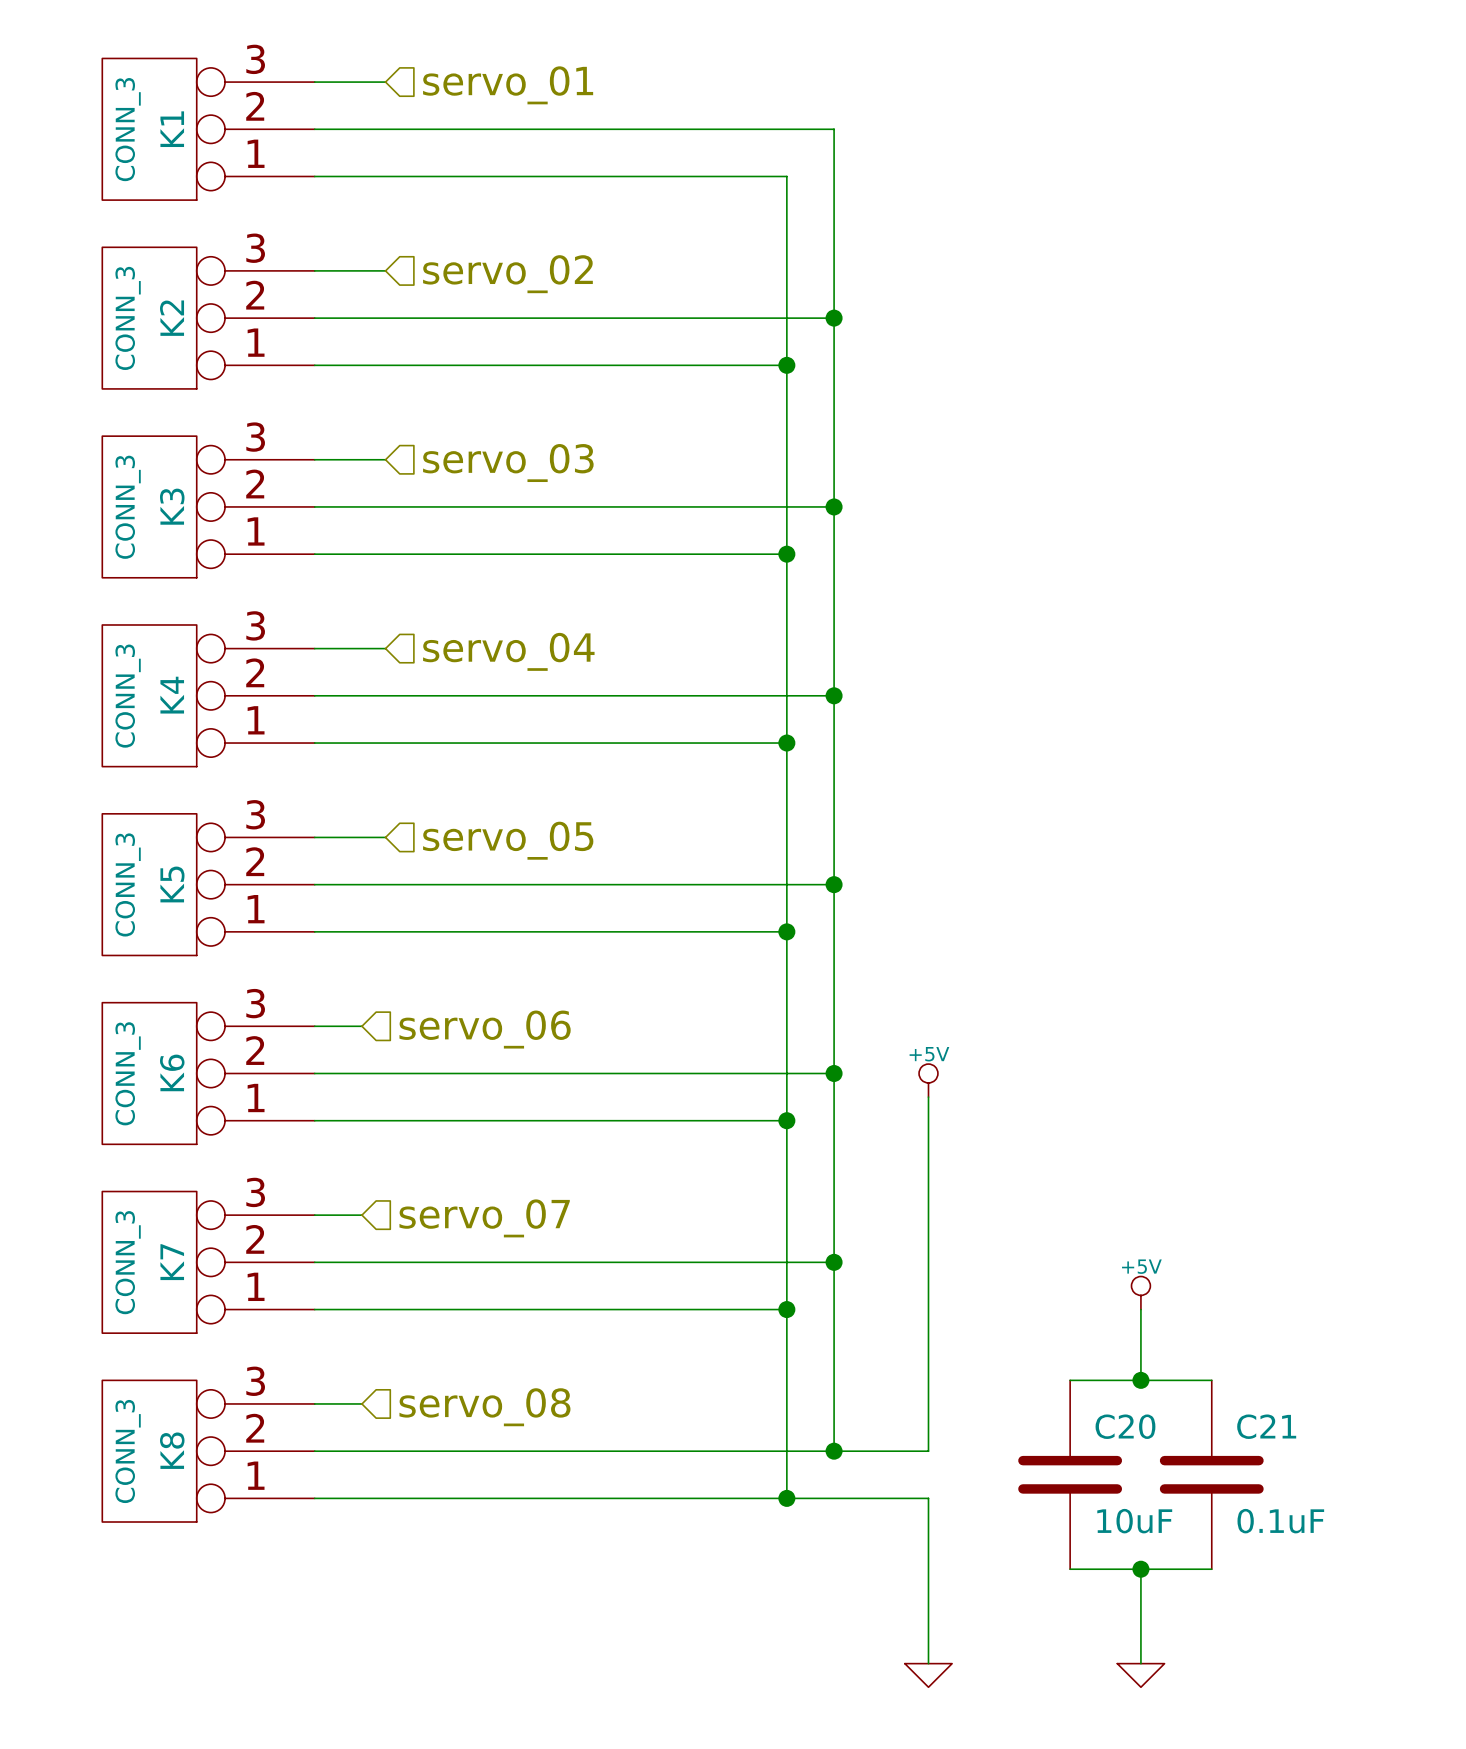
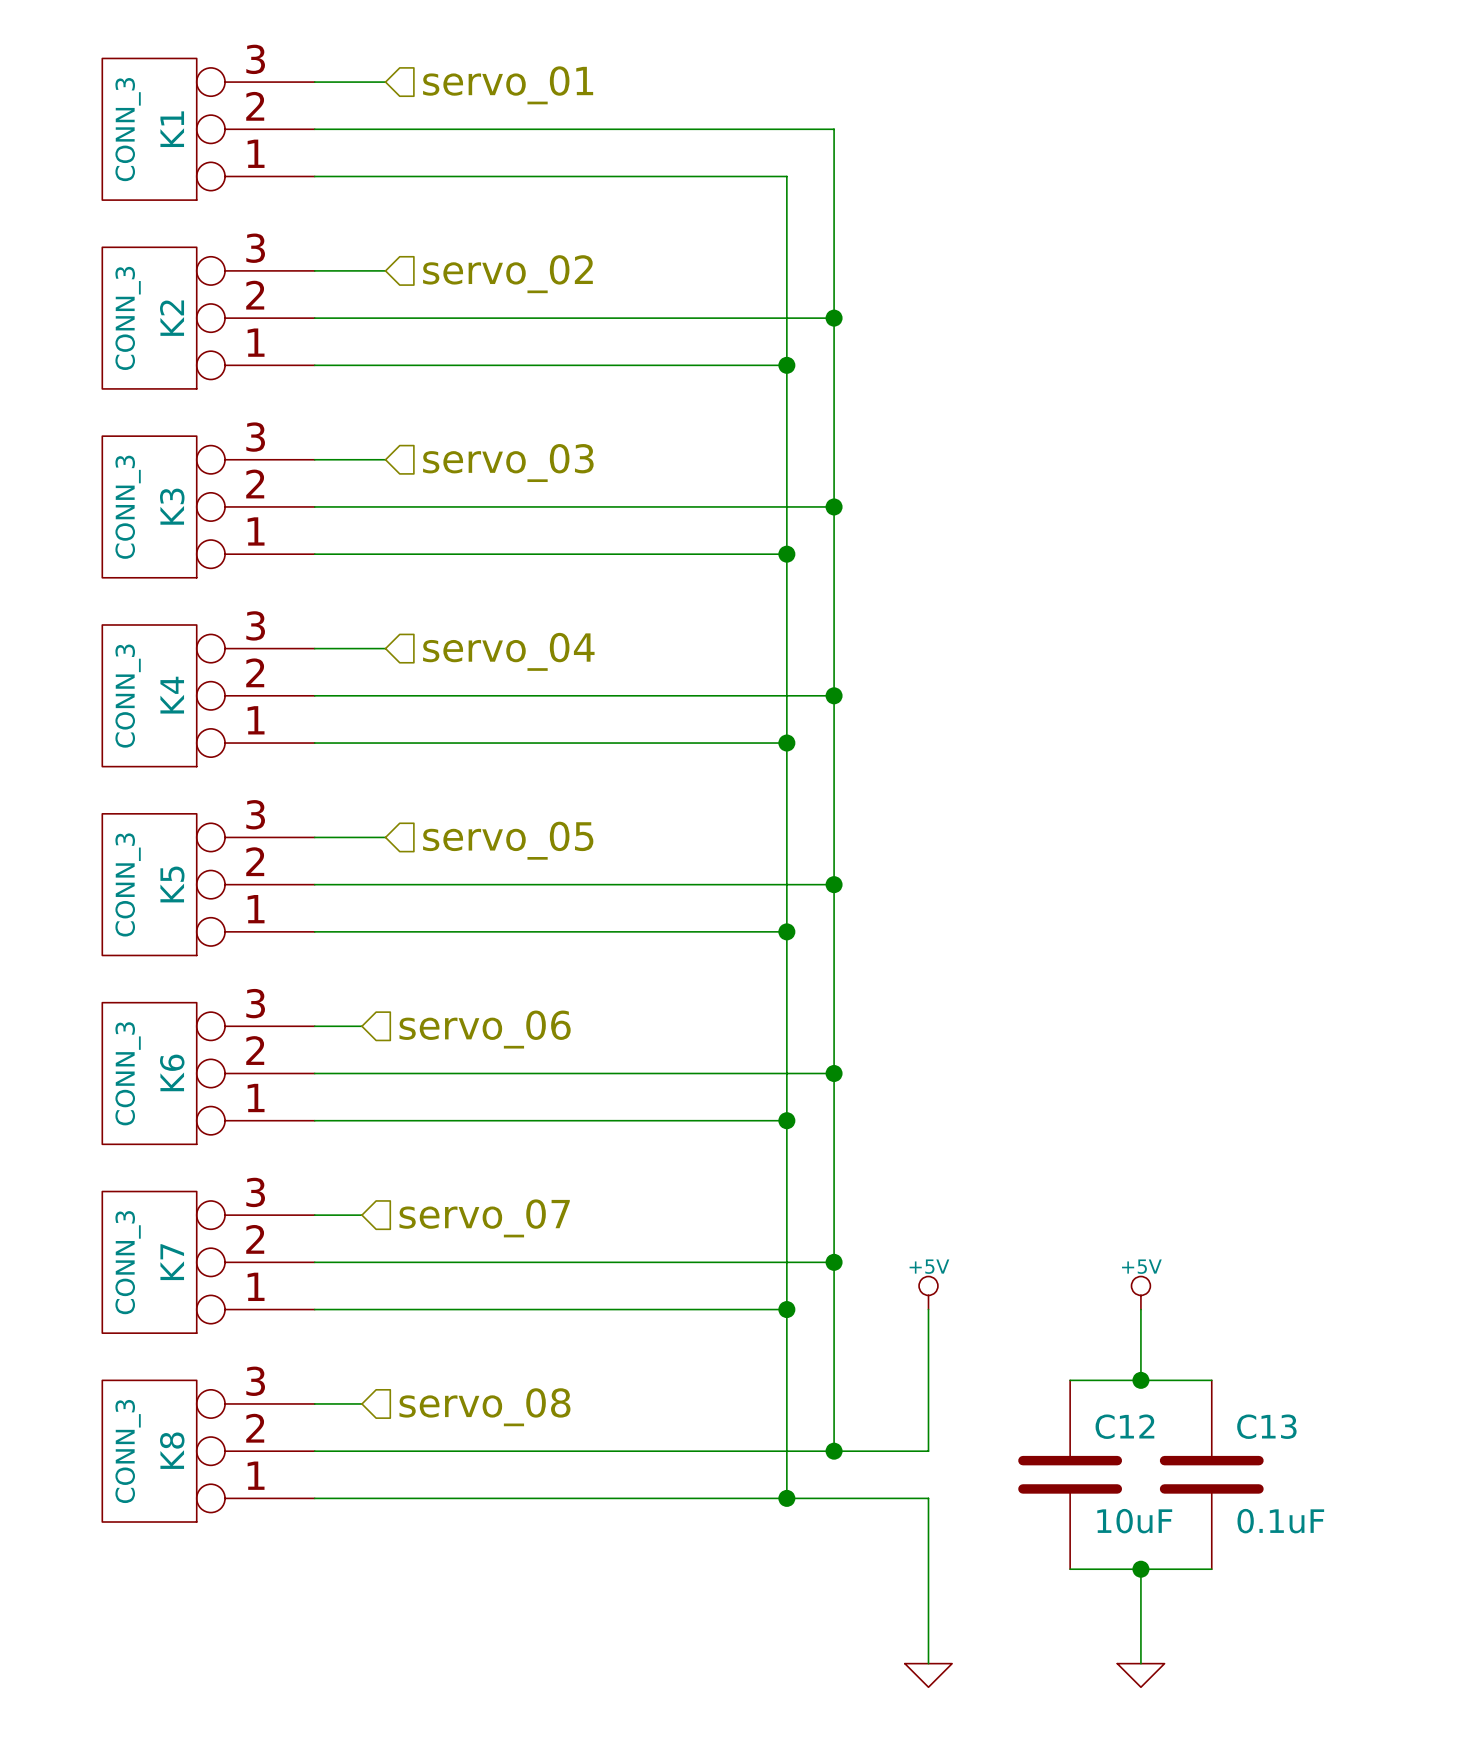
power symbol position: +5V (928, 1080) -> +5V (928, 1293)
wire: (928, 1097) (928, 1309) -> none
C20 name: C20 (1125, 1426) -> C12 (1124, 1426)
C21 name: C21 (1266, 1426) -> C13 (1266, 1426)

